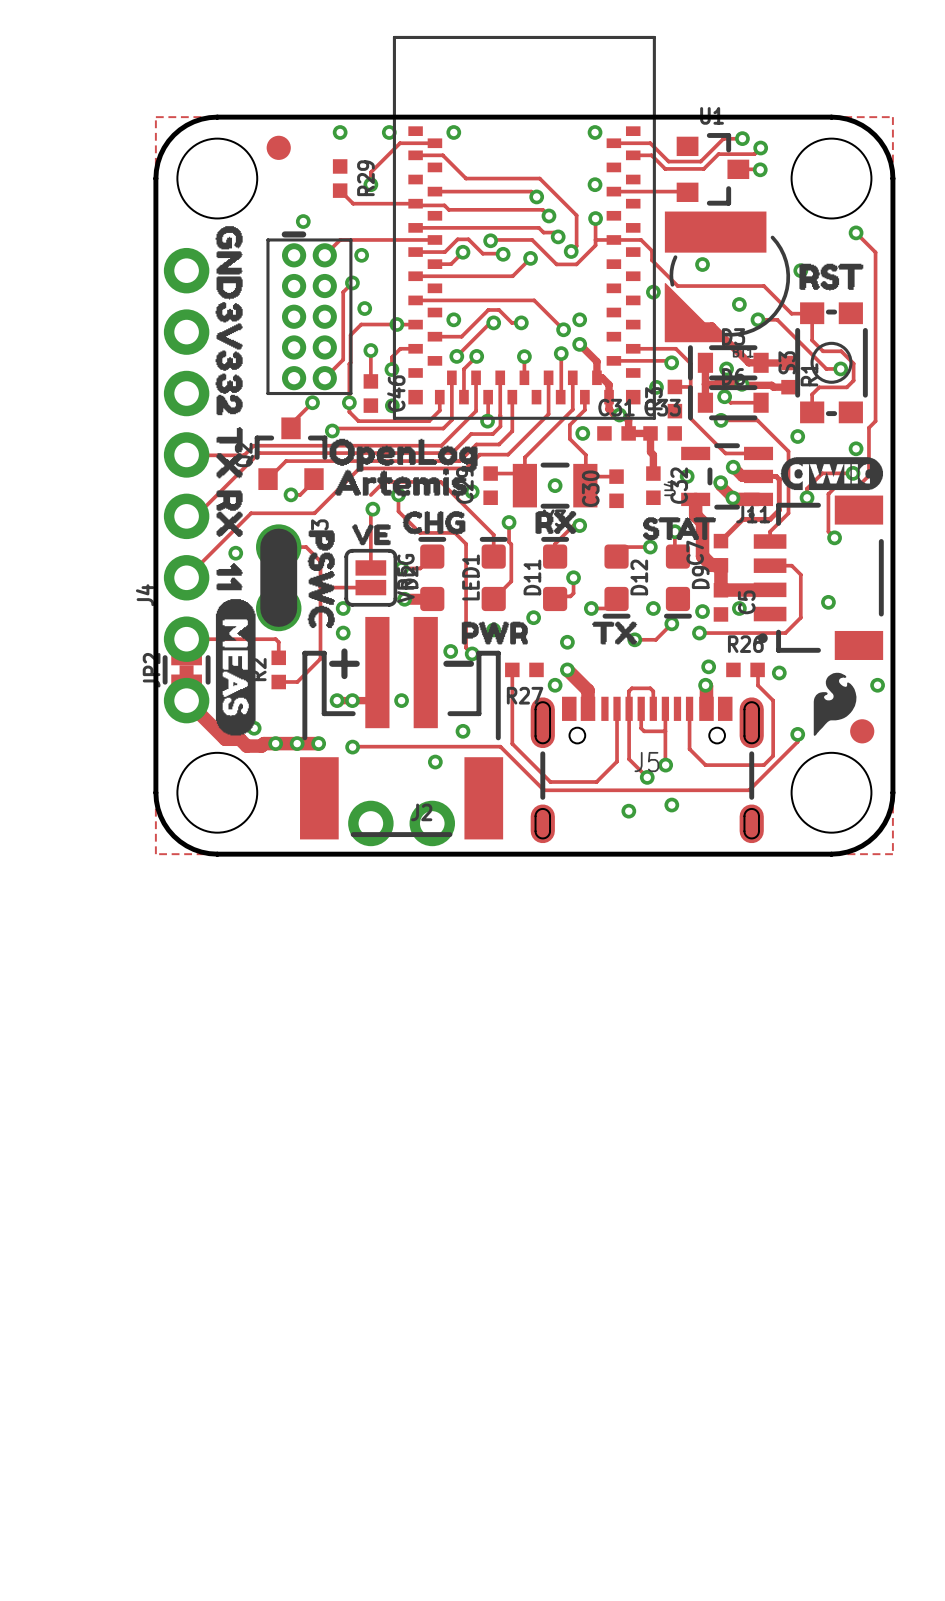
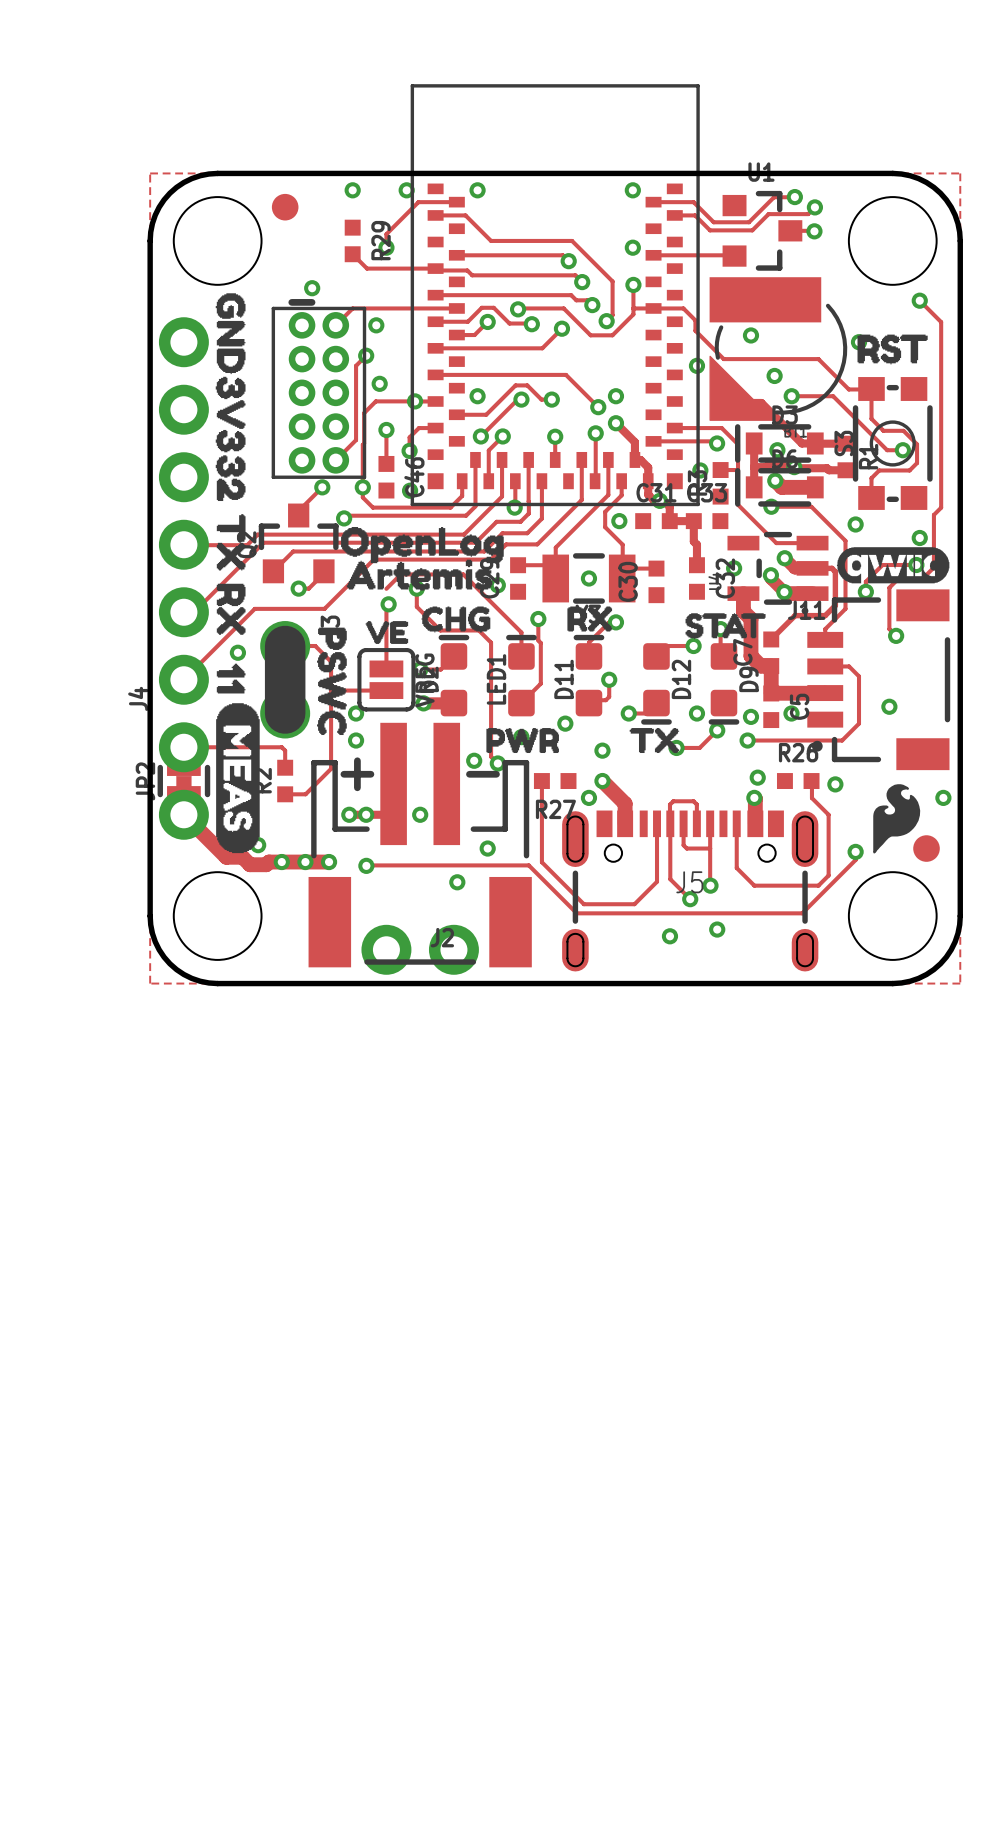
via: none -> (774, 375)
via: (739, 304) -> none
track: none -> (791, 396) (811, 396)
via: none -> (791, 396)
via: (758, 319) -> none
track width: thin (724, 396) (730, 402) (761, 402) -> thick (775, 480) (781, 487) (815, 487)

